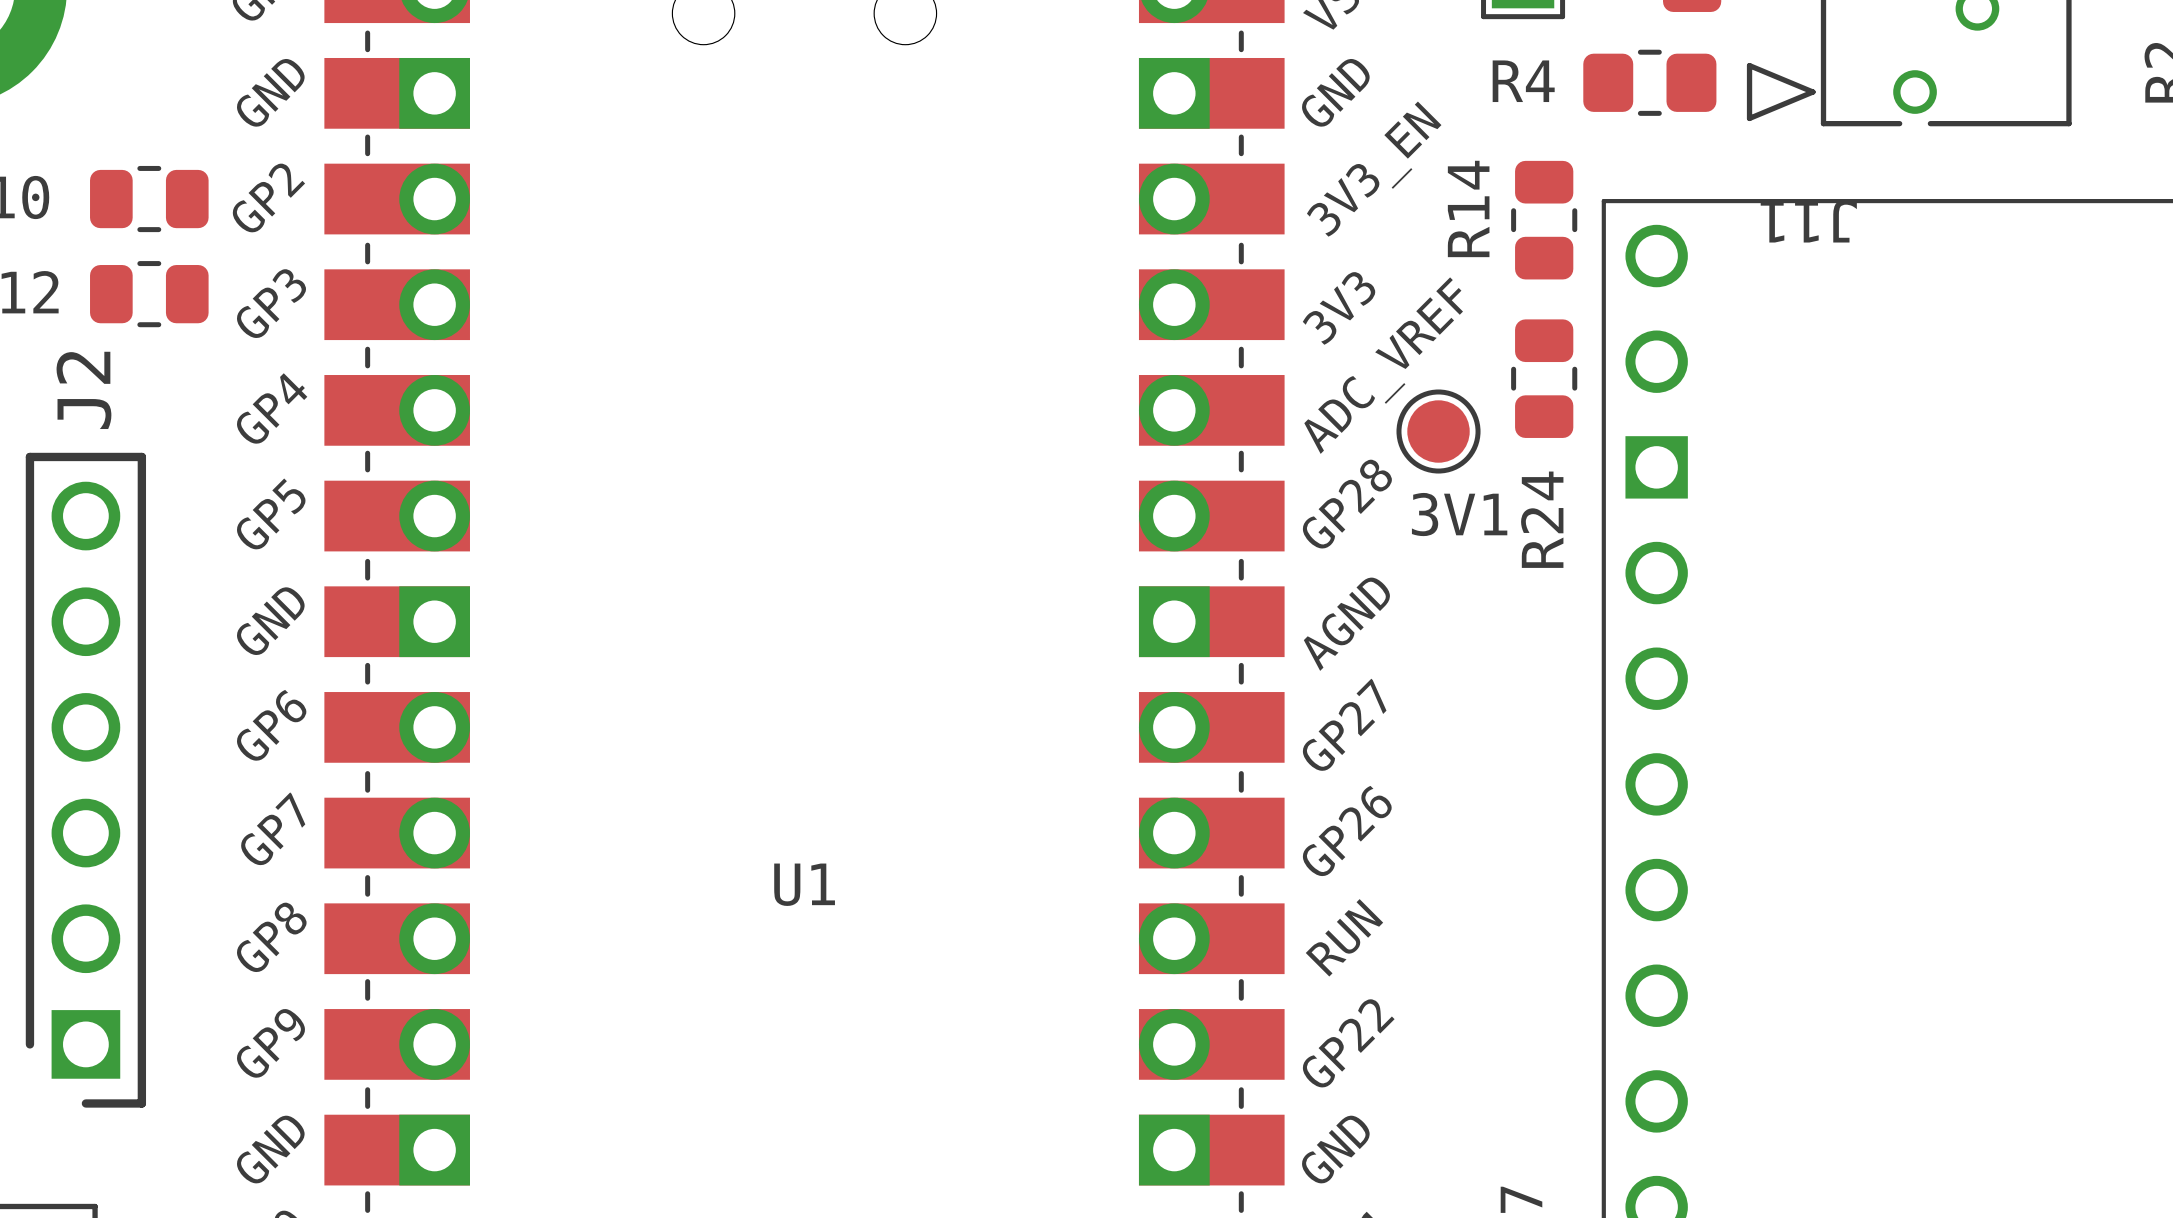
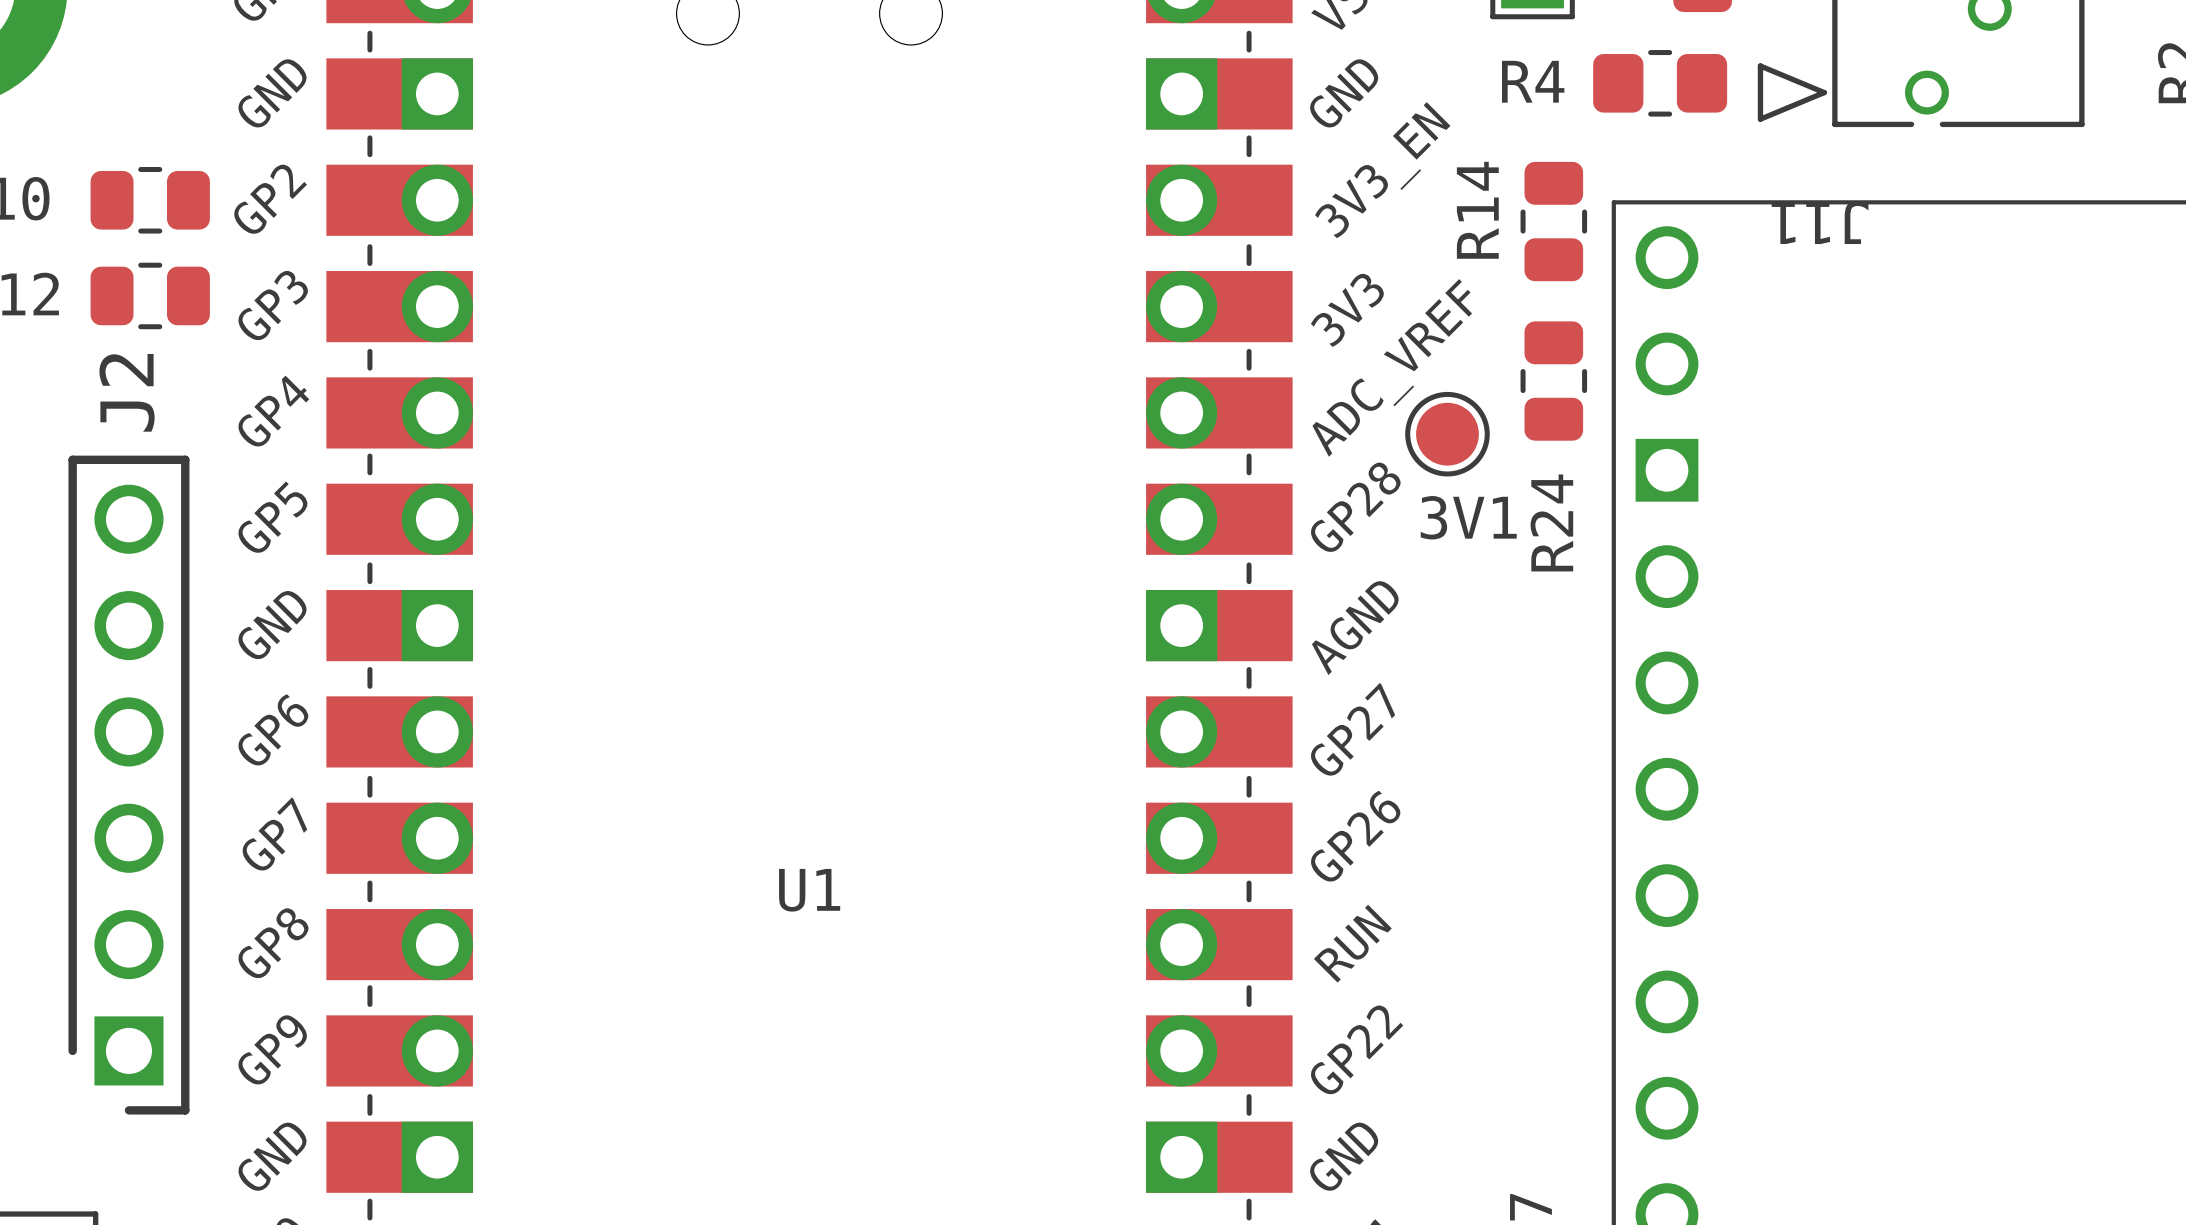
J2 position: (85, 780) -> (128, 785)

